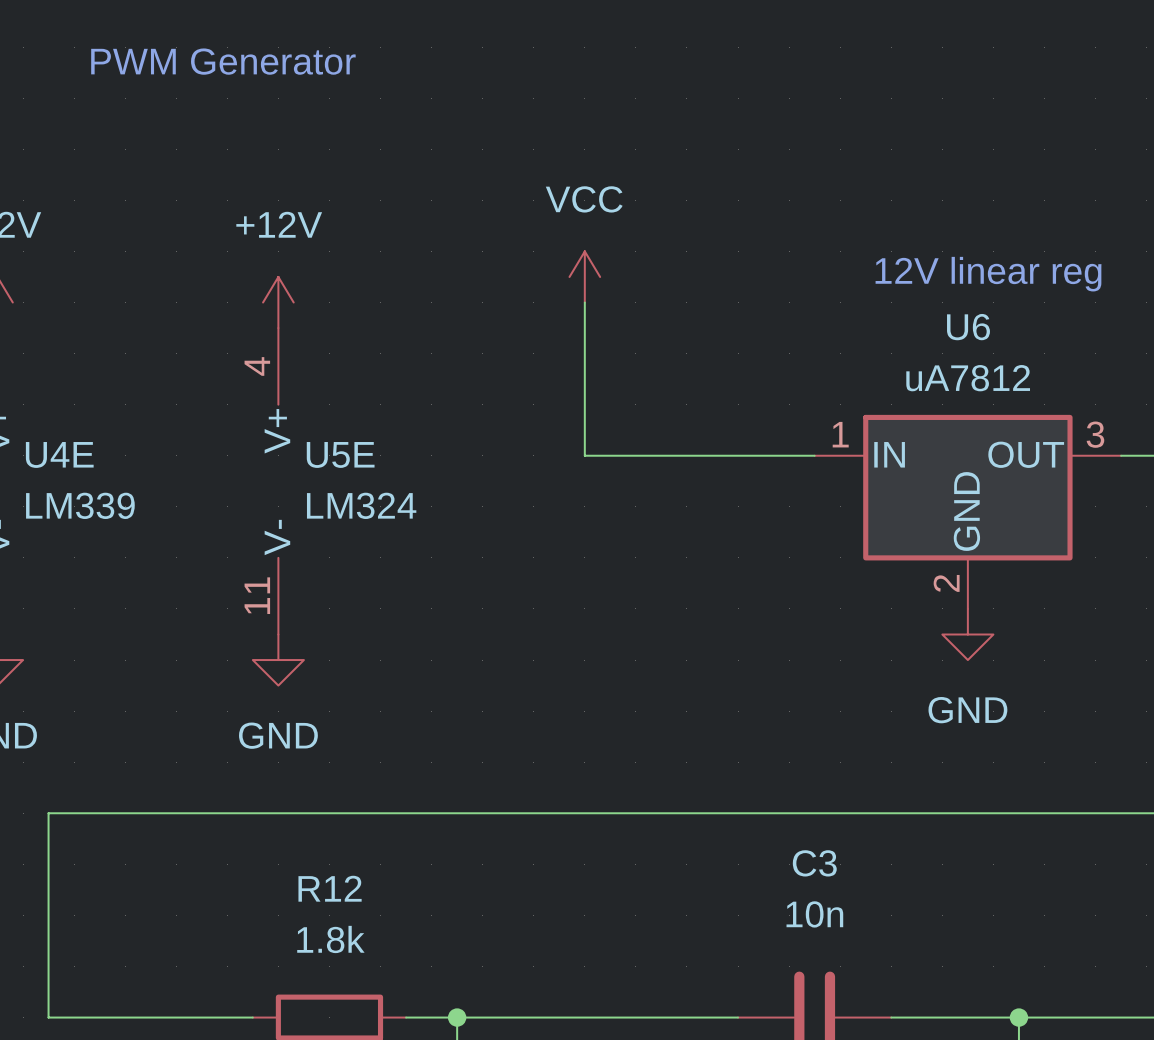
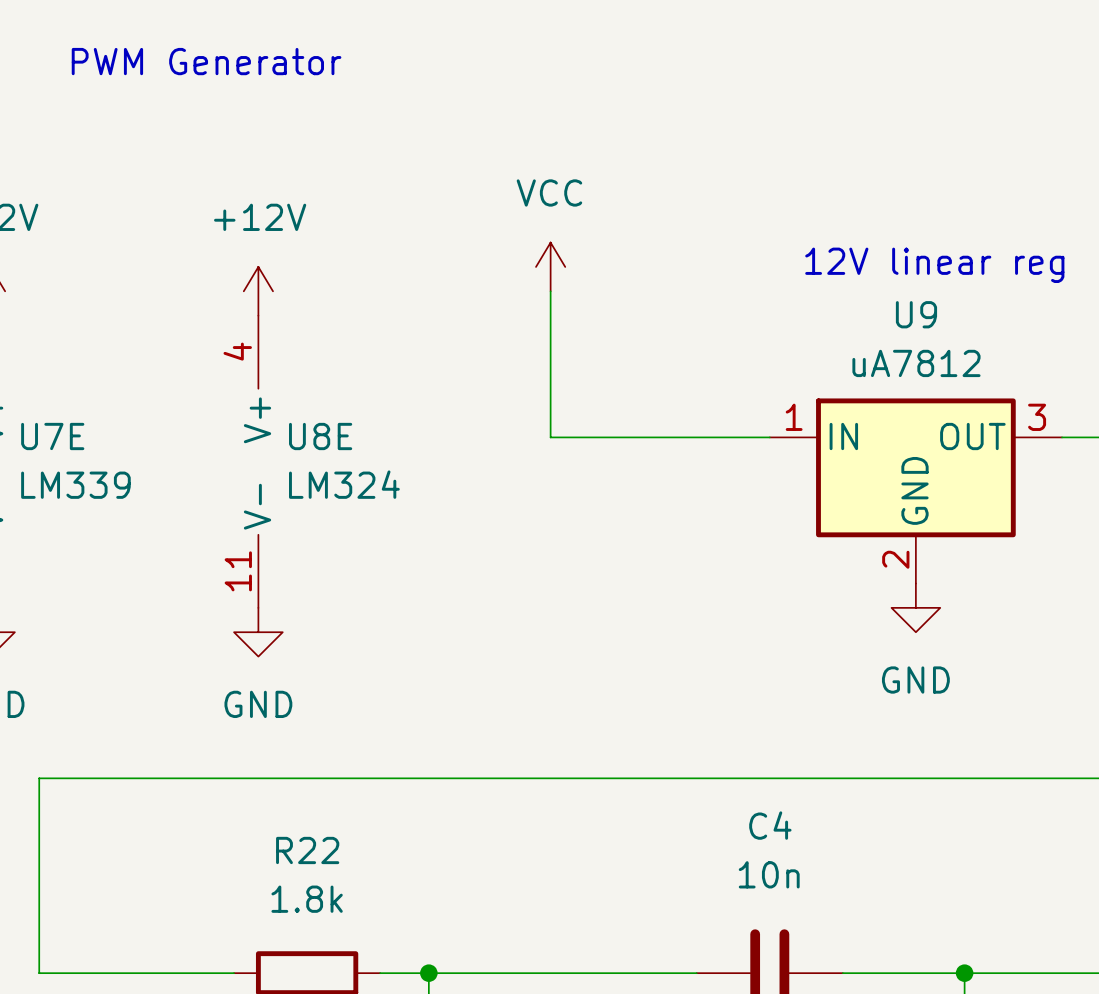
U6 name: U6 (968, 327) -> U9 (916, 314)
U4E name: U4E (59, 454) -> U7E (52, 436)
U5E name: U5E (340, 454) -> U8E (320, 436)
C3 name: C3 (814, 863) -> C4 (770, 825)
R12 name: R12 (330, 888) -> R22 (307, 850)

